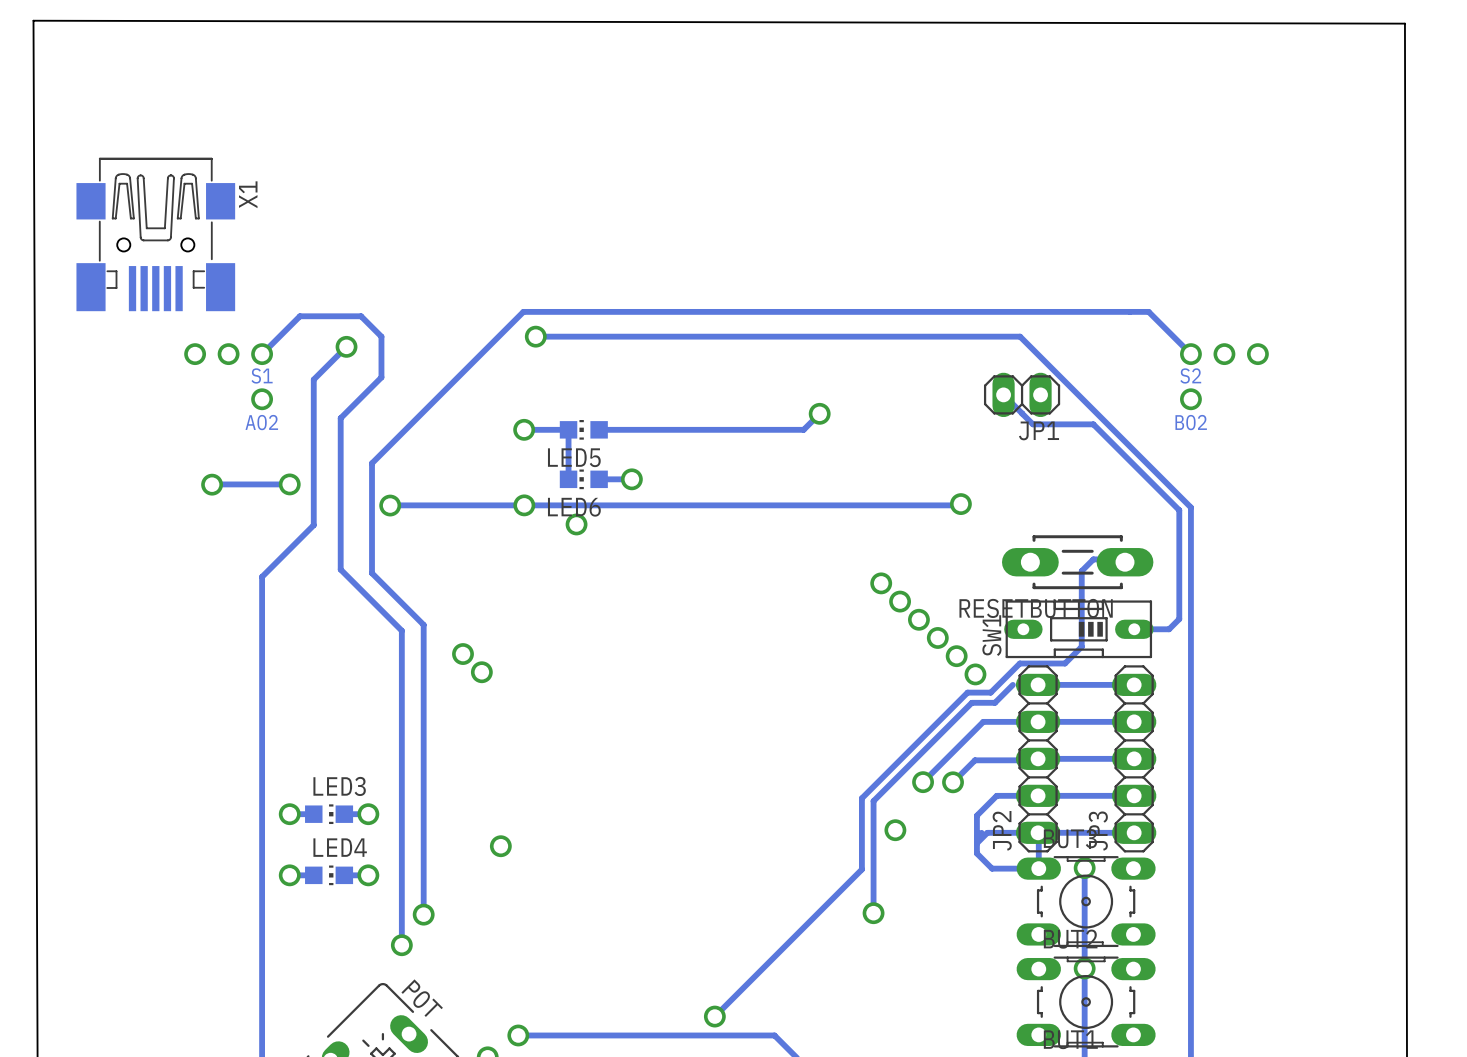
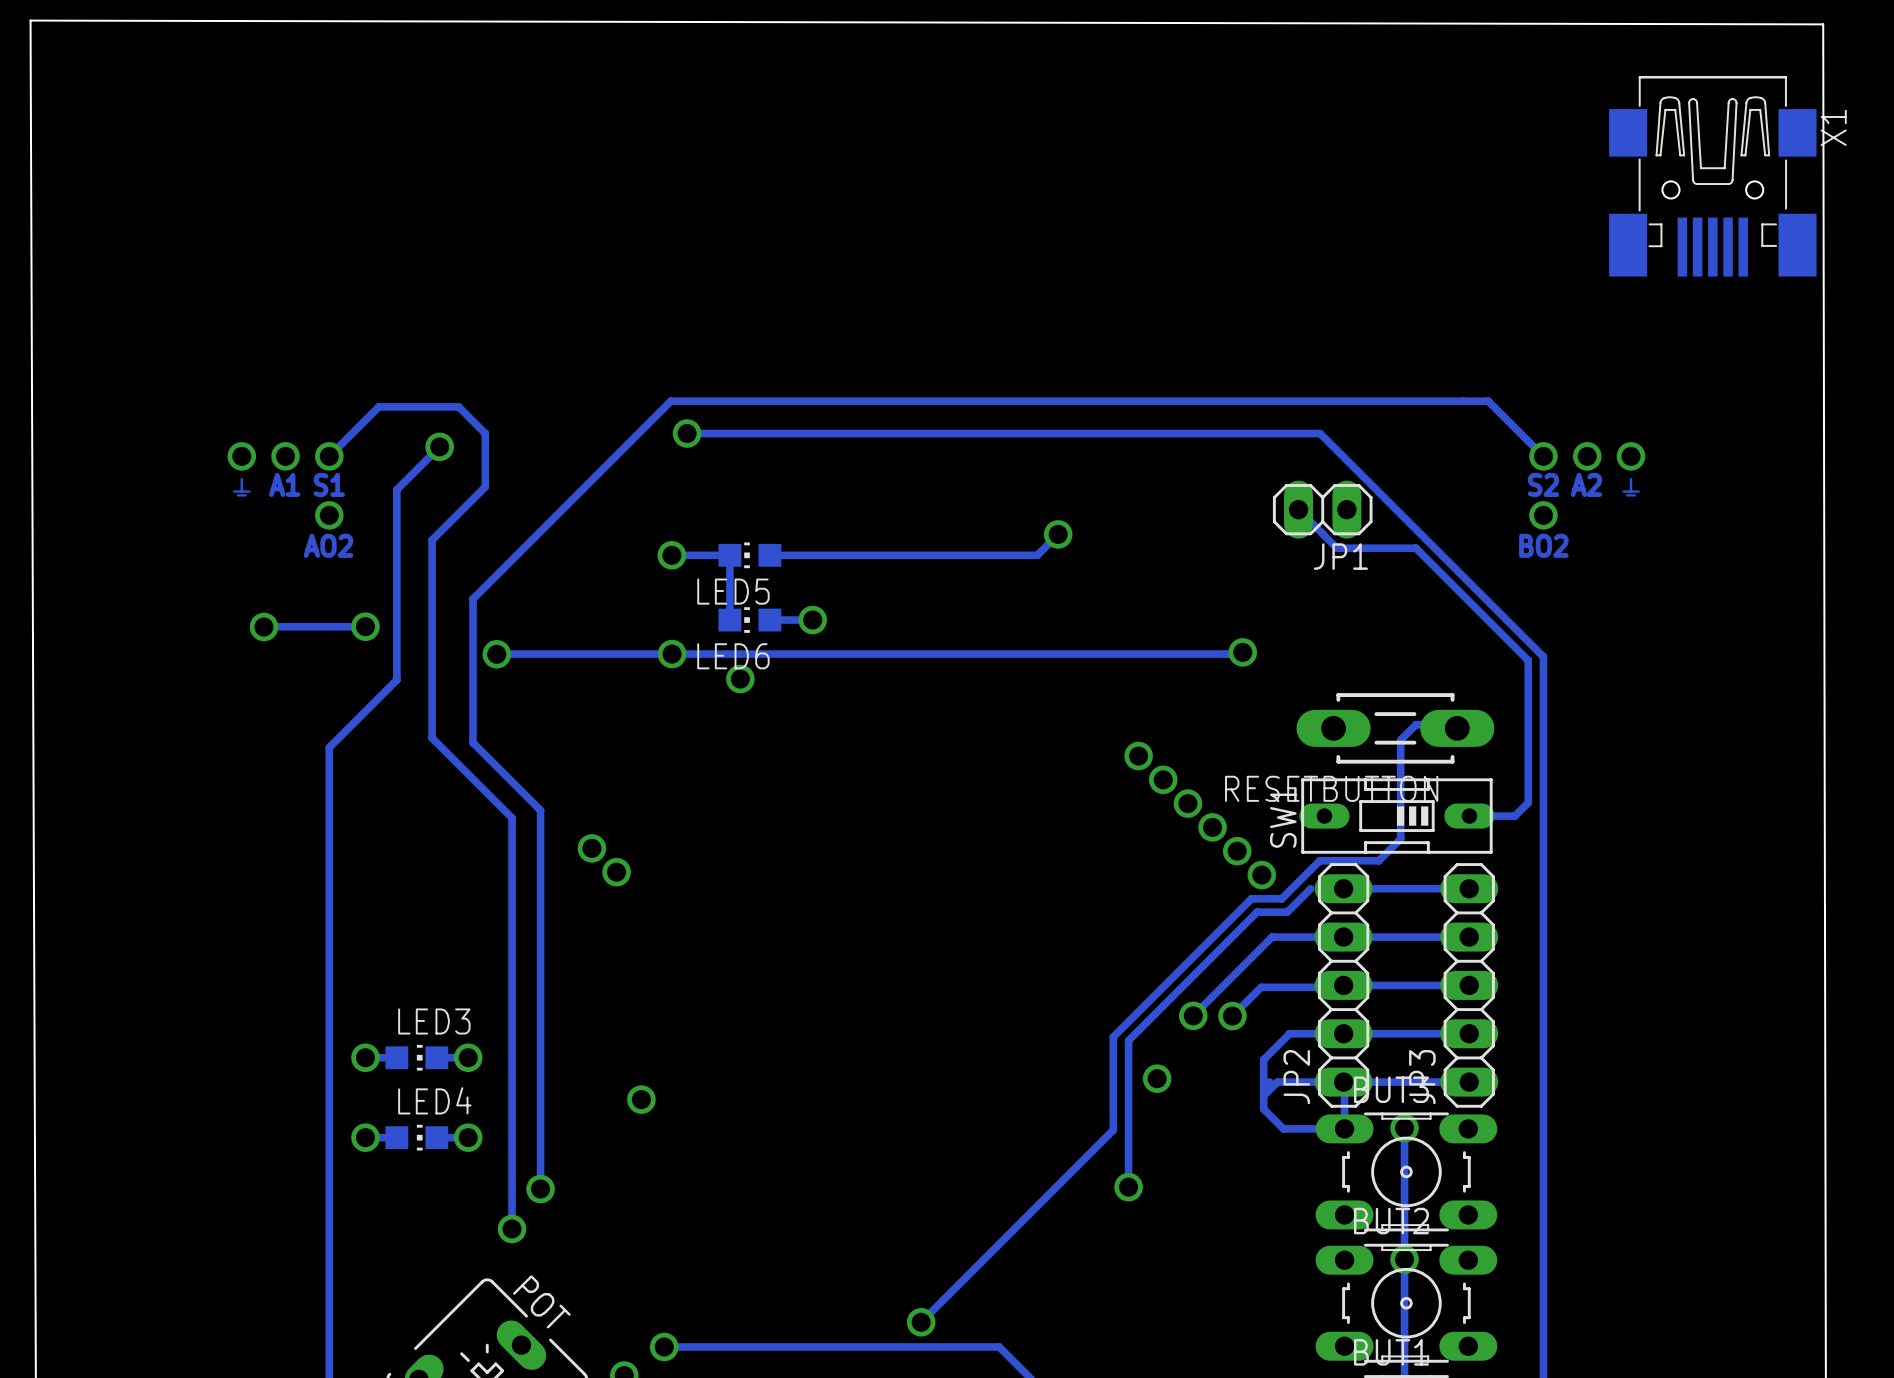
X1 position: (155, 234) -> (1712, 176)
drawing: none -> [232, 477, 251, 497]
drawing: none -> [1622, 477, 1640, 497]
text: none -> A1 (284, 484)
text: none -> A2 (1586, 484)

